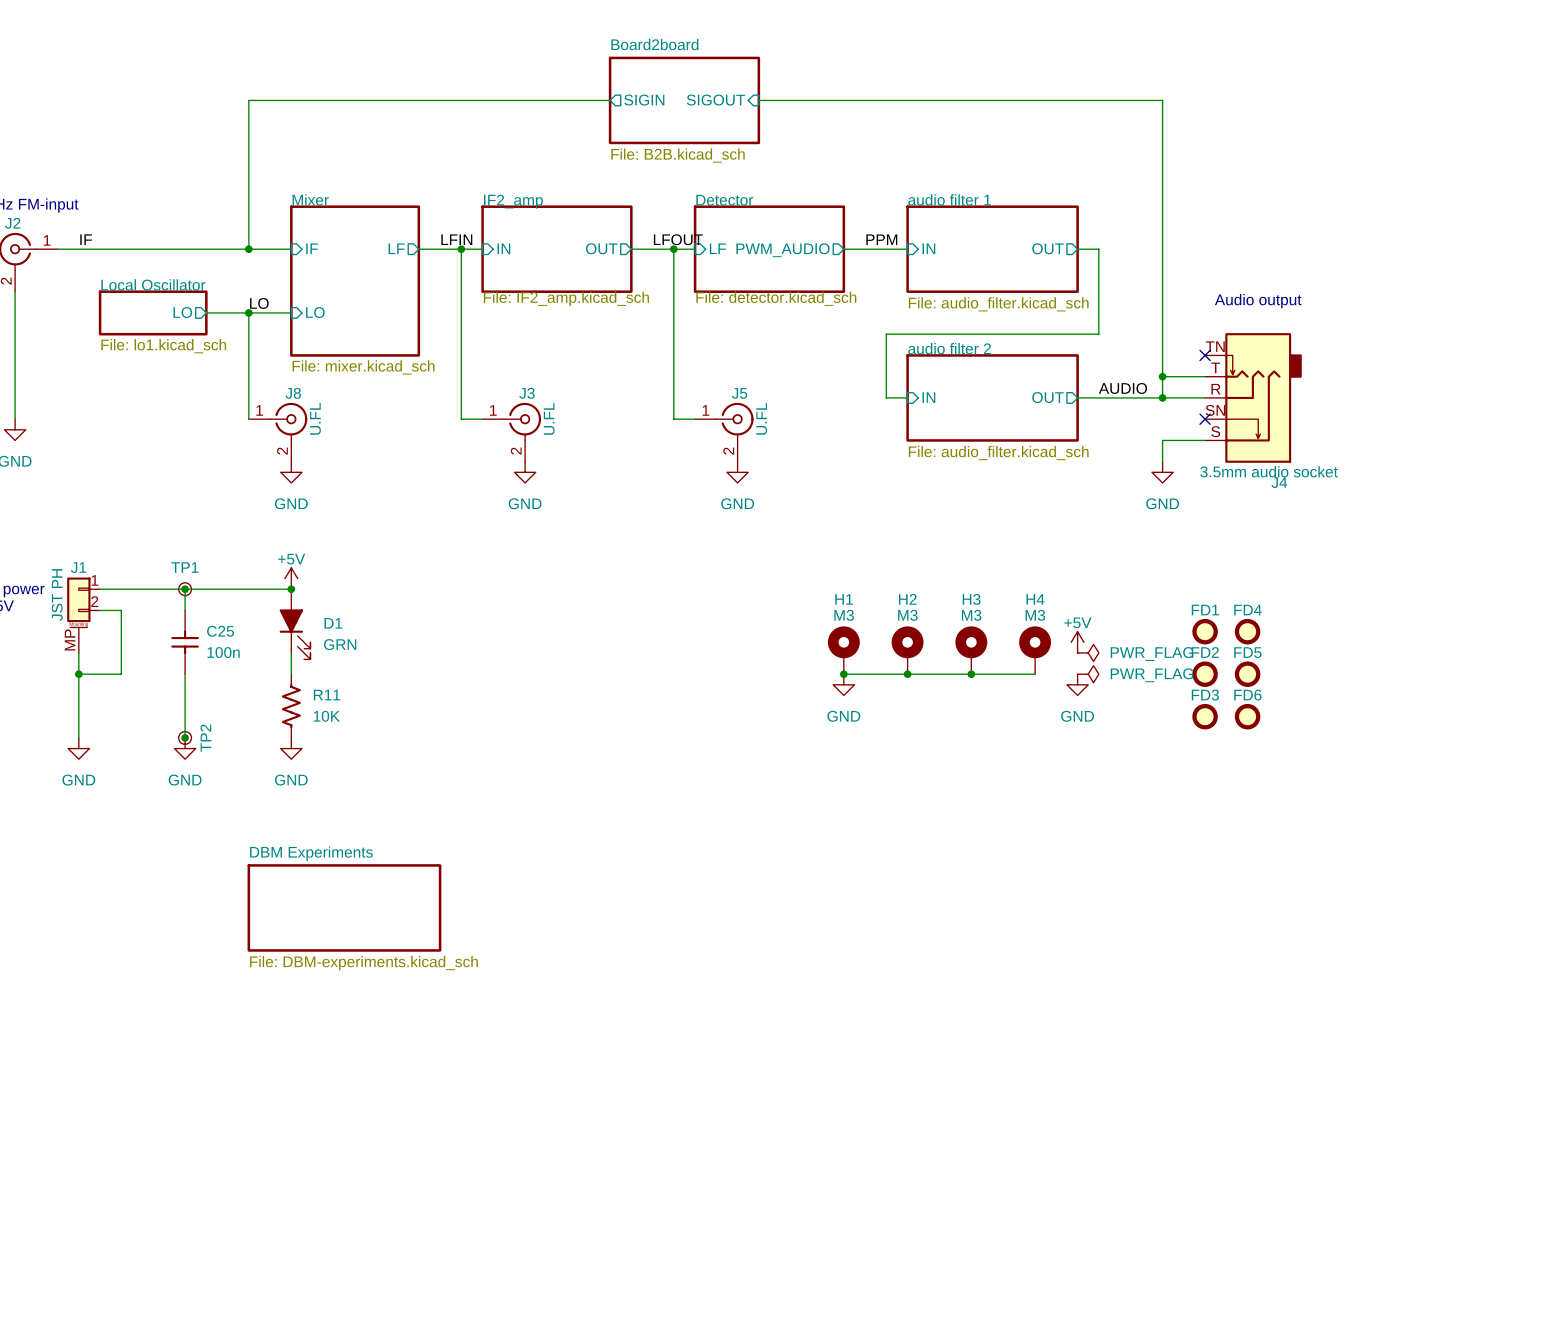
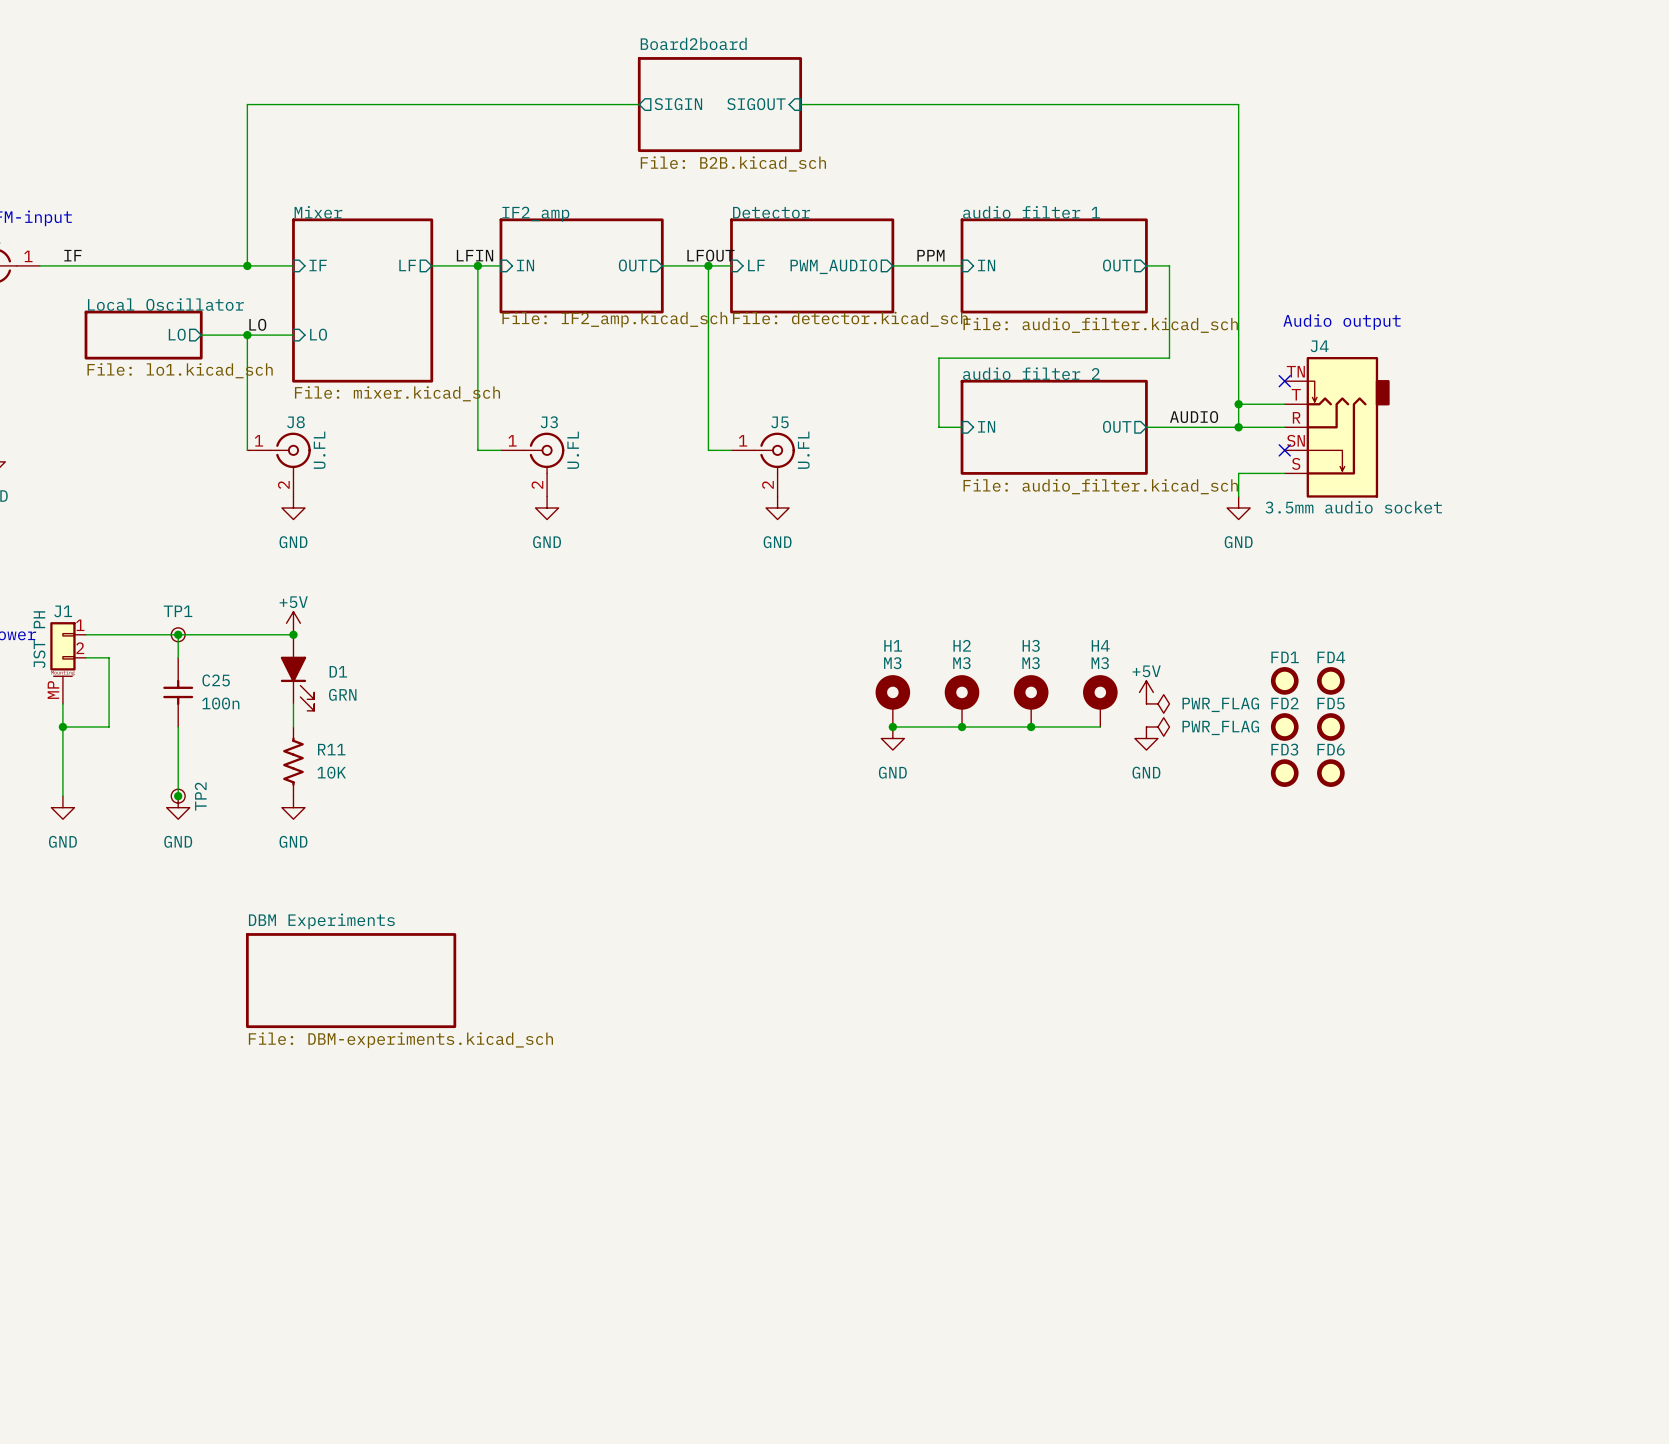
J4 name position: J4 (1279, 482) -> J4 (1319, 346)

